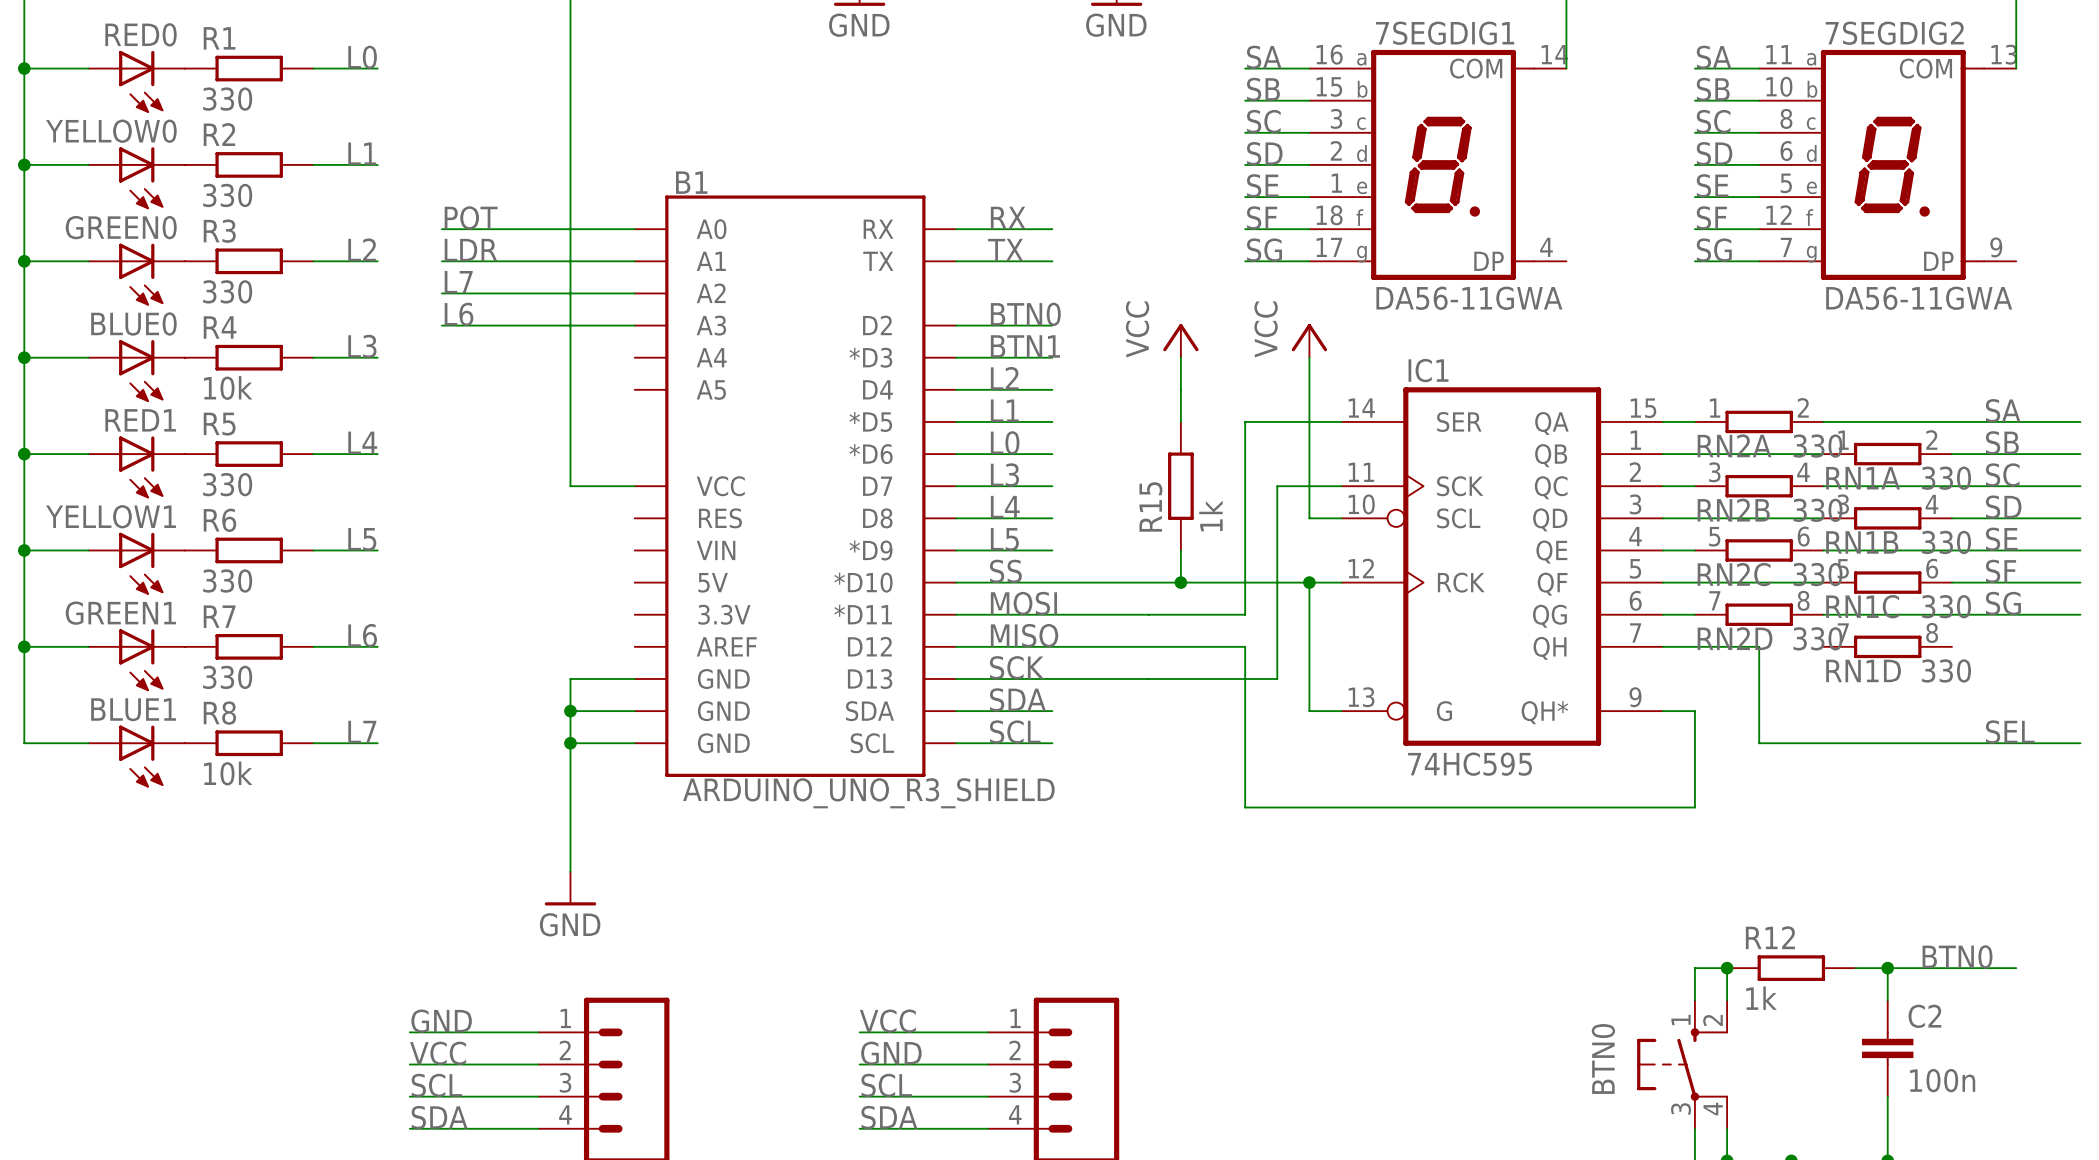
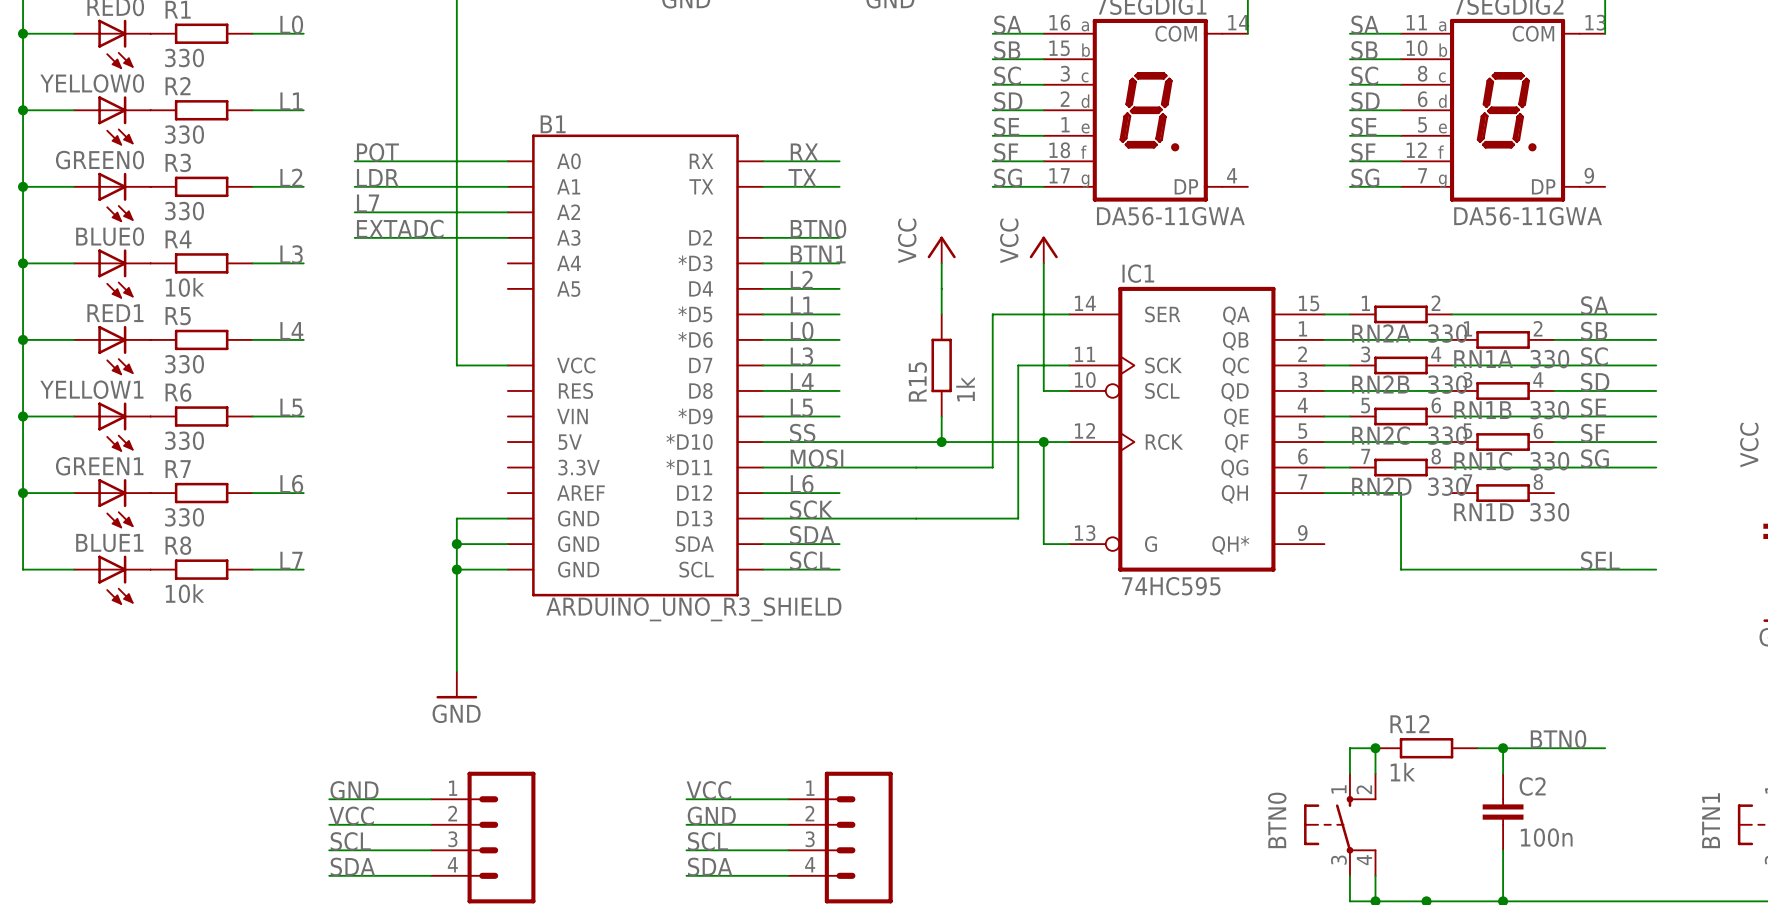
label: L6 (459, 314) -> EXTADC (400, 228)
label: MISO (1024, 635) -> L6 (802, 484)
wire: (1052, 646) (1245, 646) (1245, 807) (1694, 807) (1694, 711) (1662, 711) -> none

